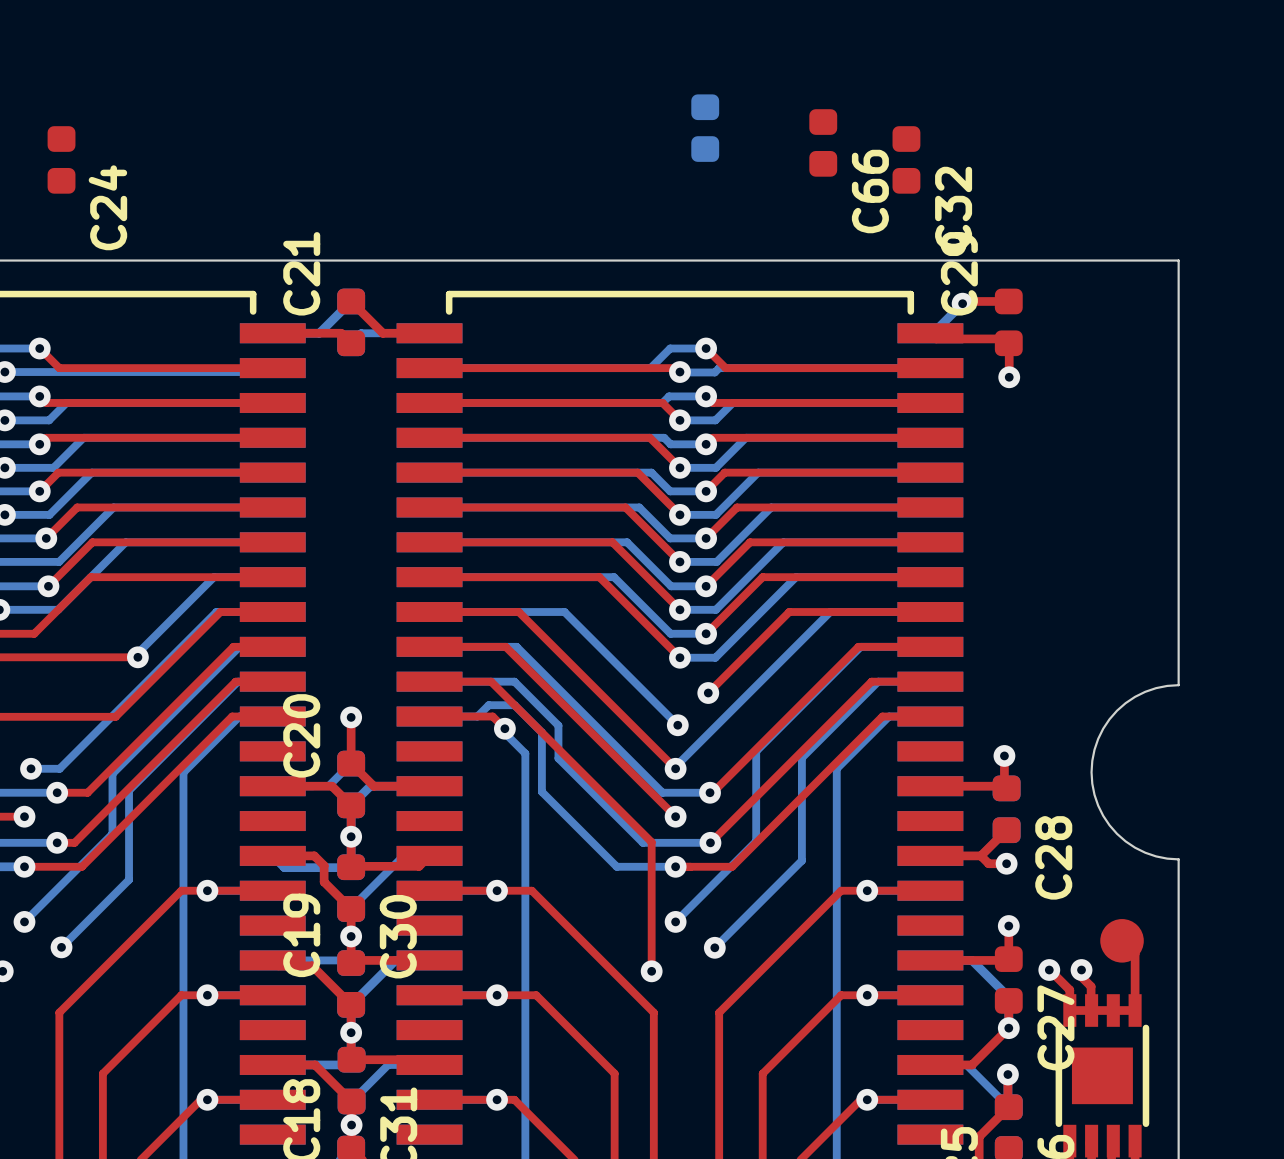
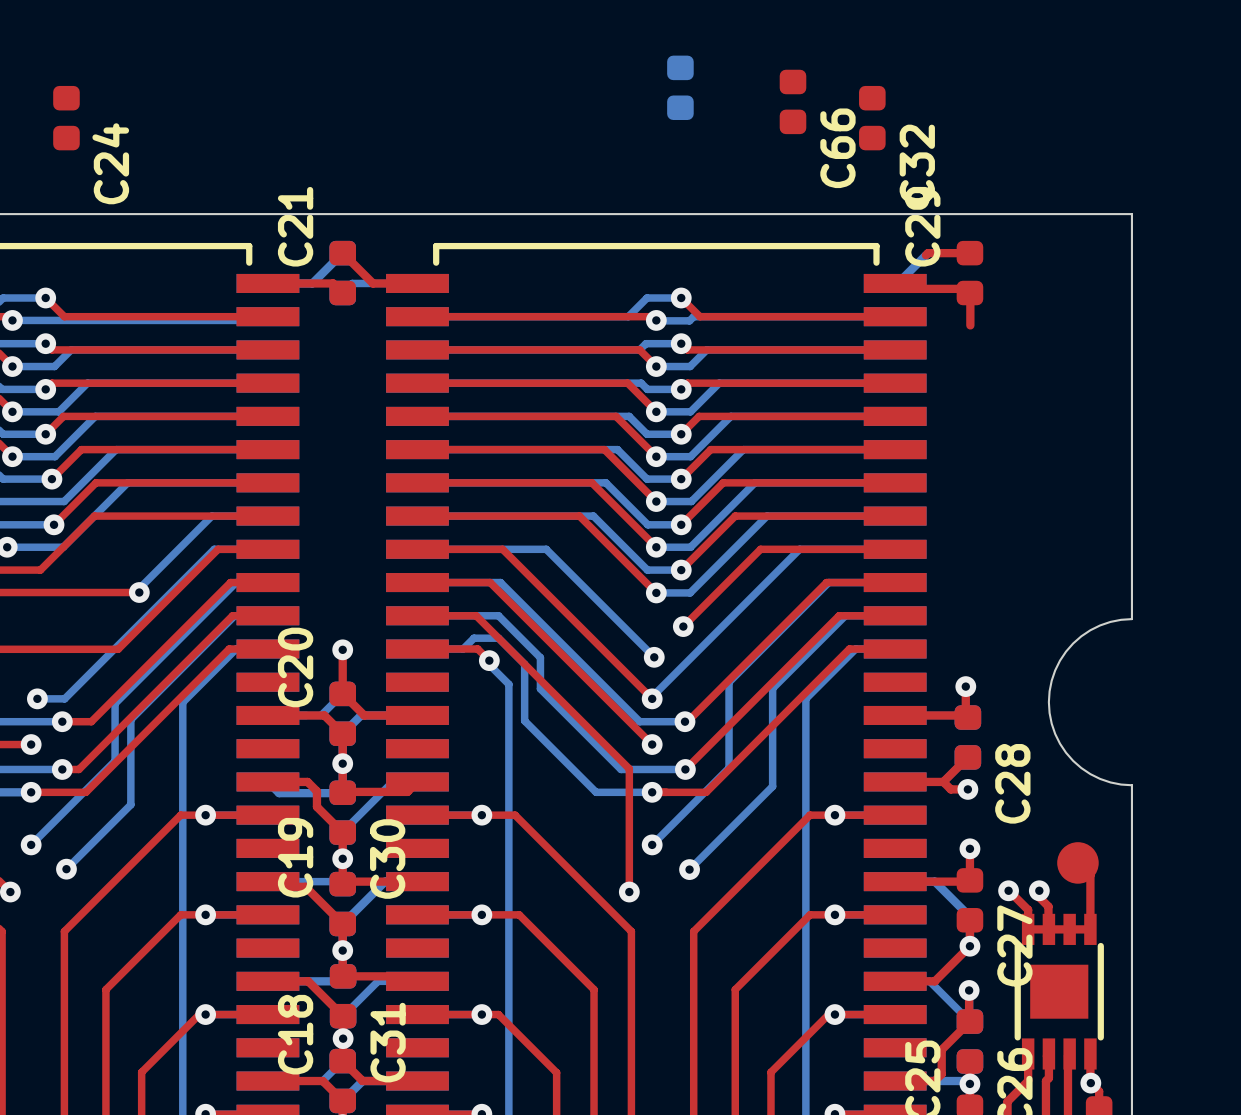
via: (962, 303) -> none
via: (1009, 377) -> none

